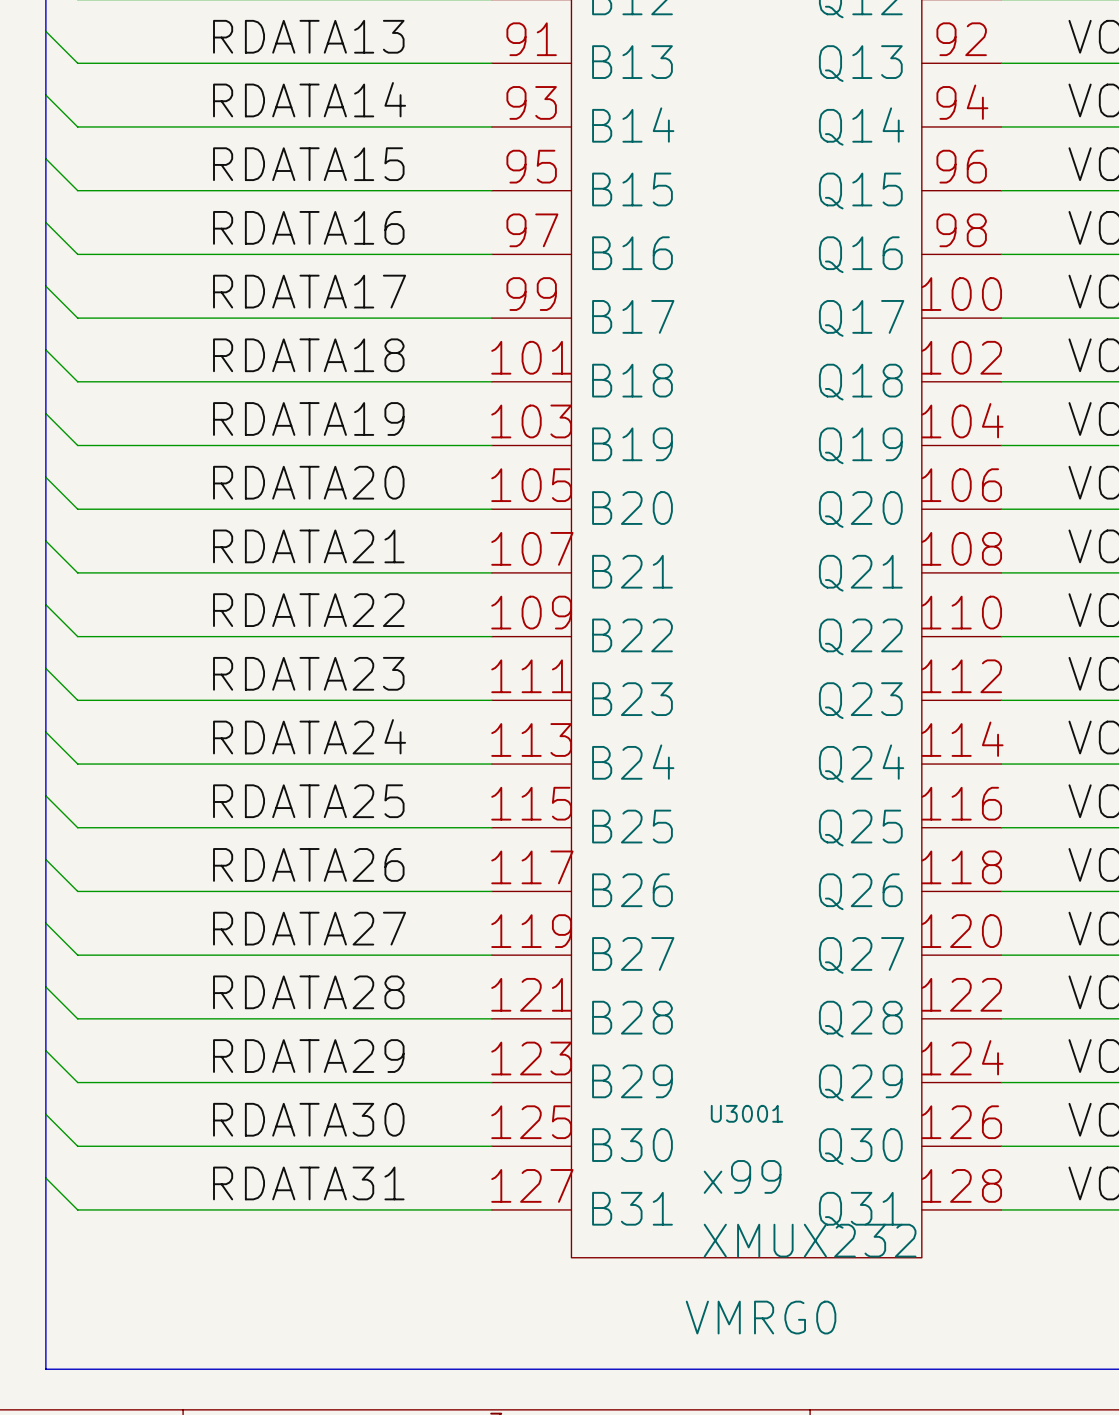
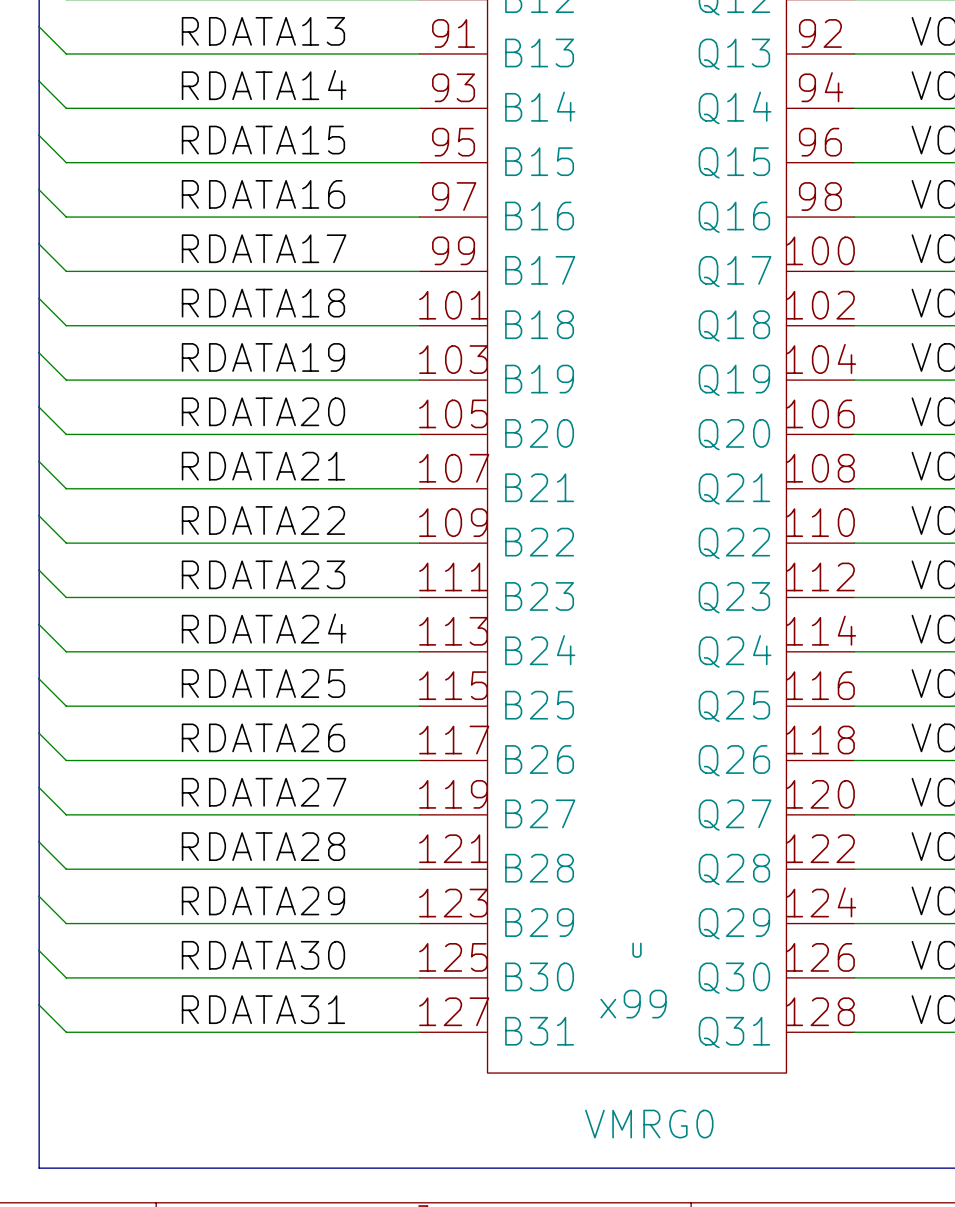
U3001 name: U3001 (747, 1113) -> U (636, 950)
U3001 value: XMUX232 (810, 1240) -> none

